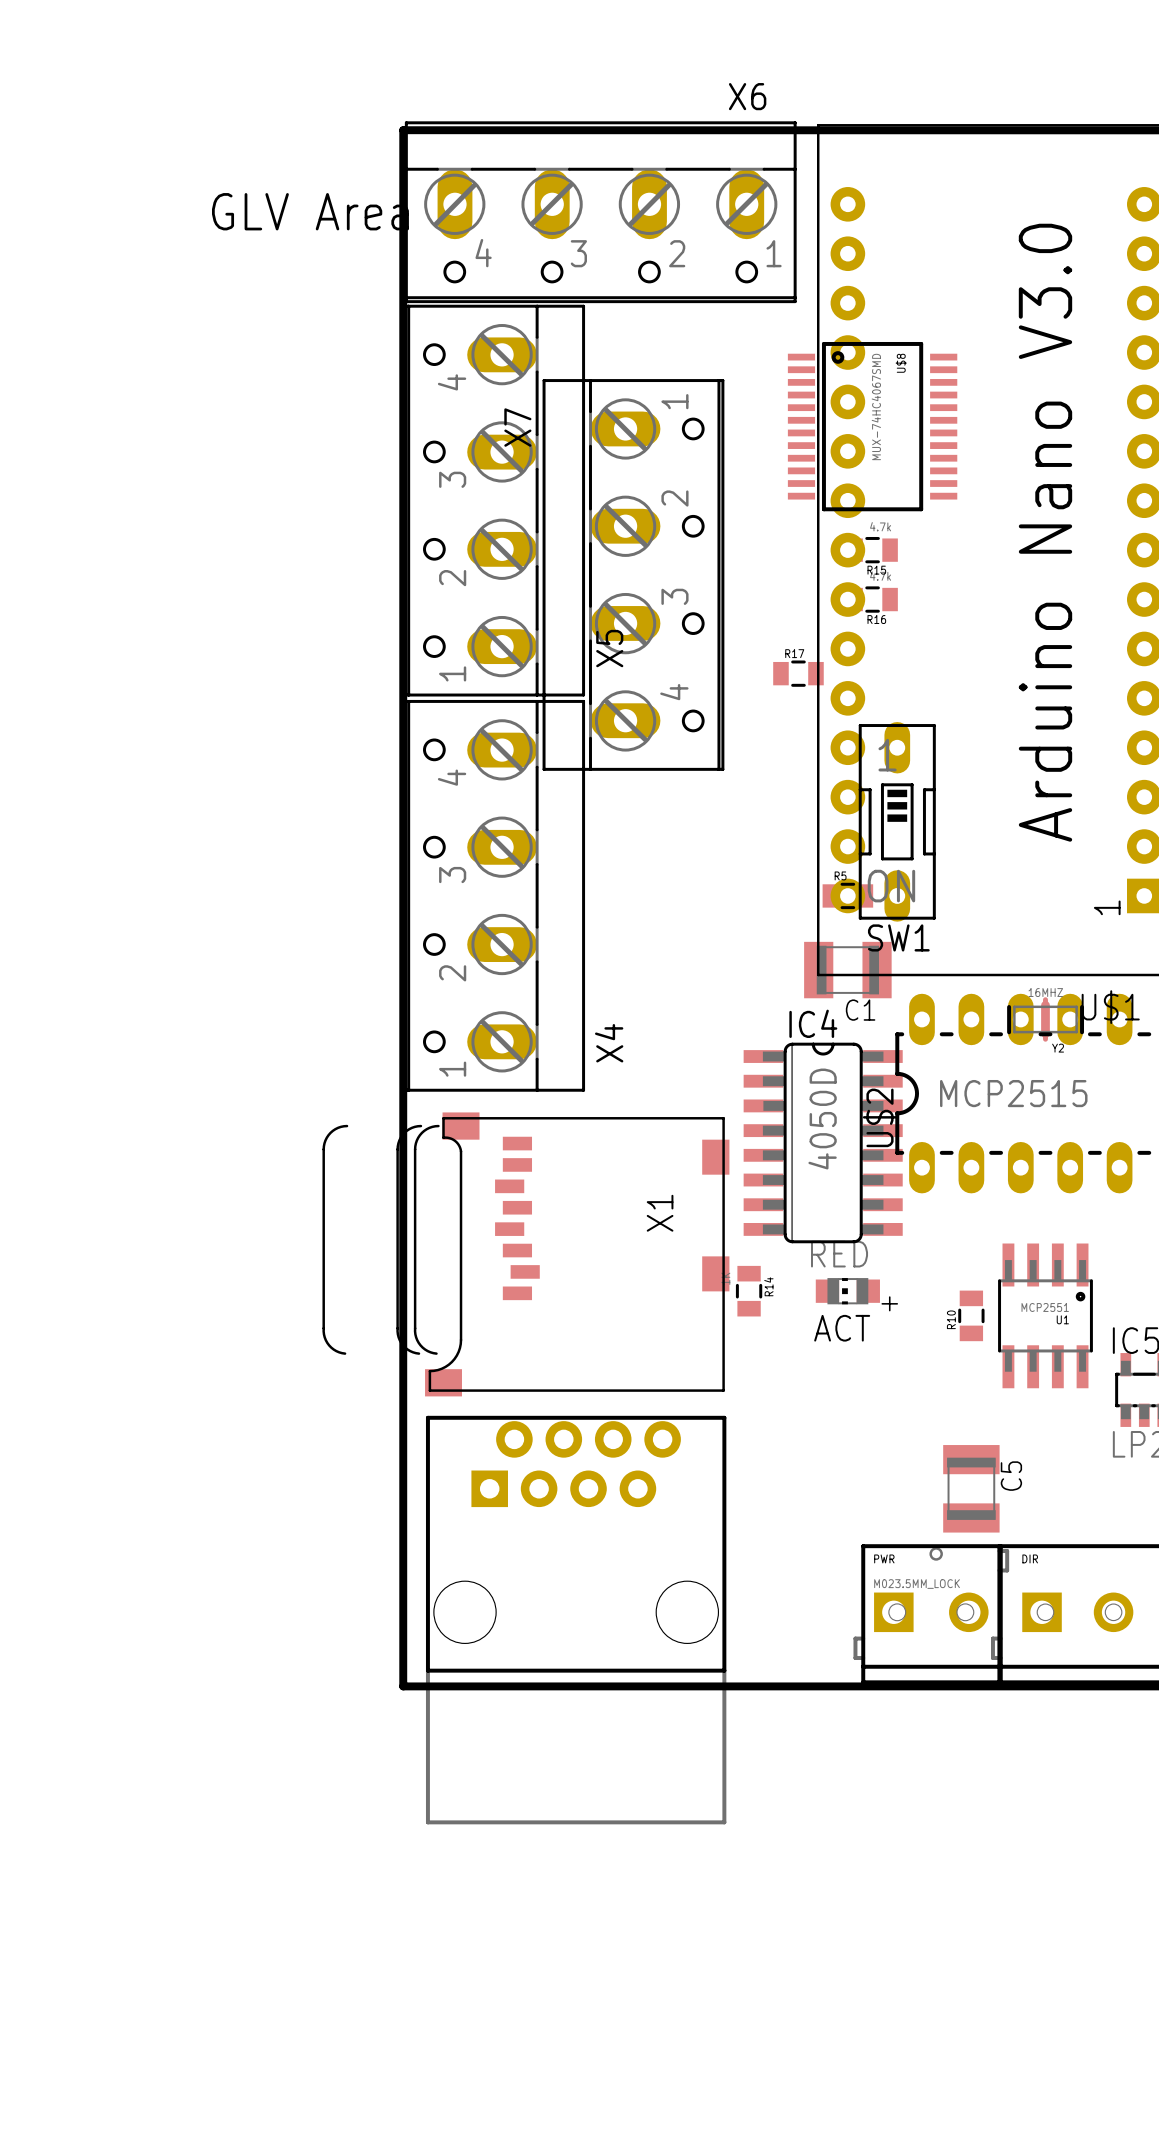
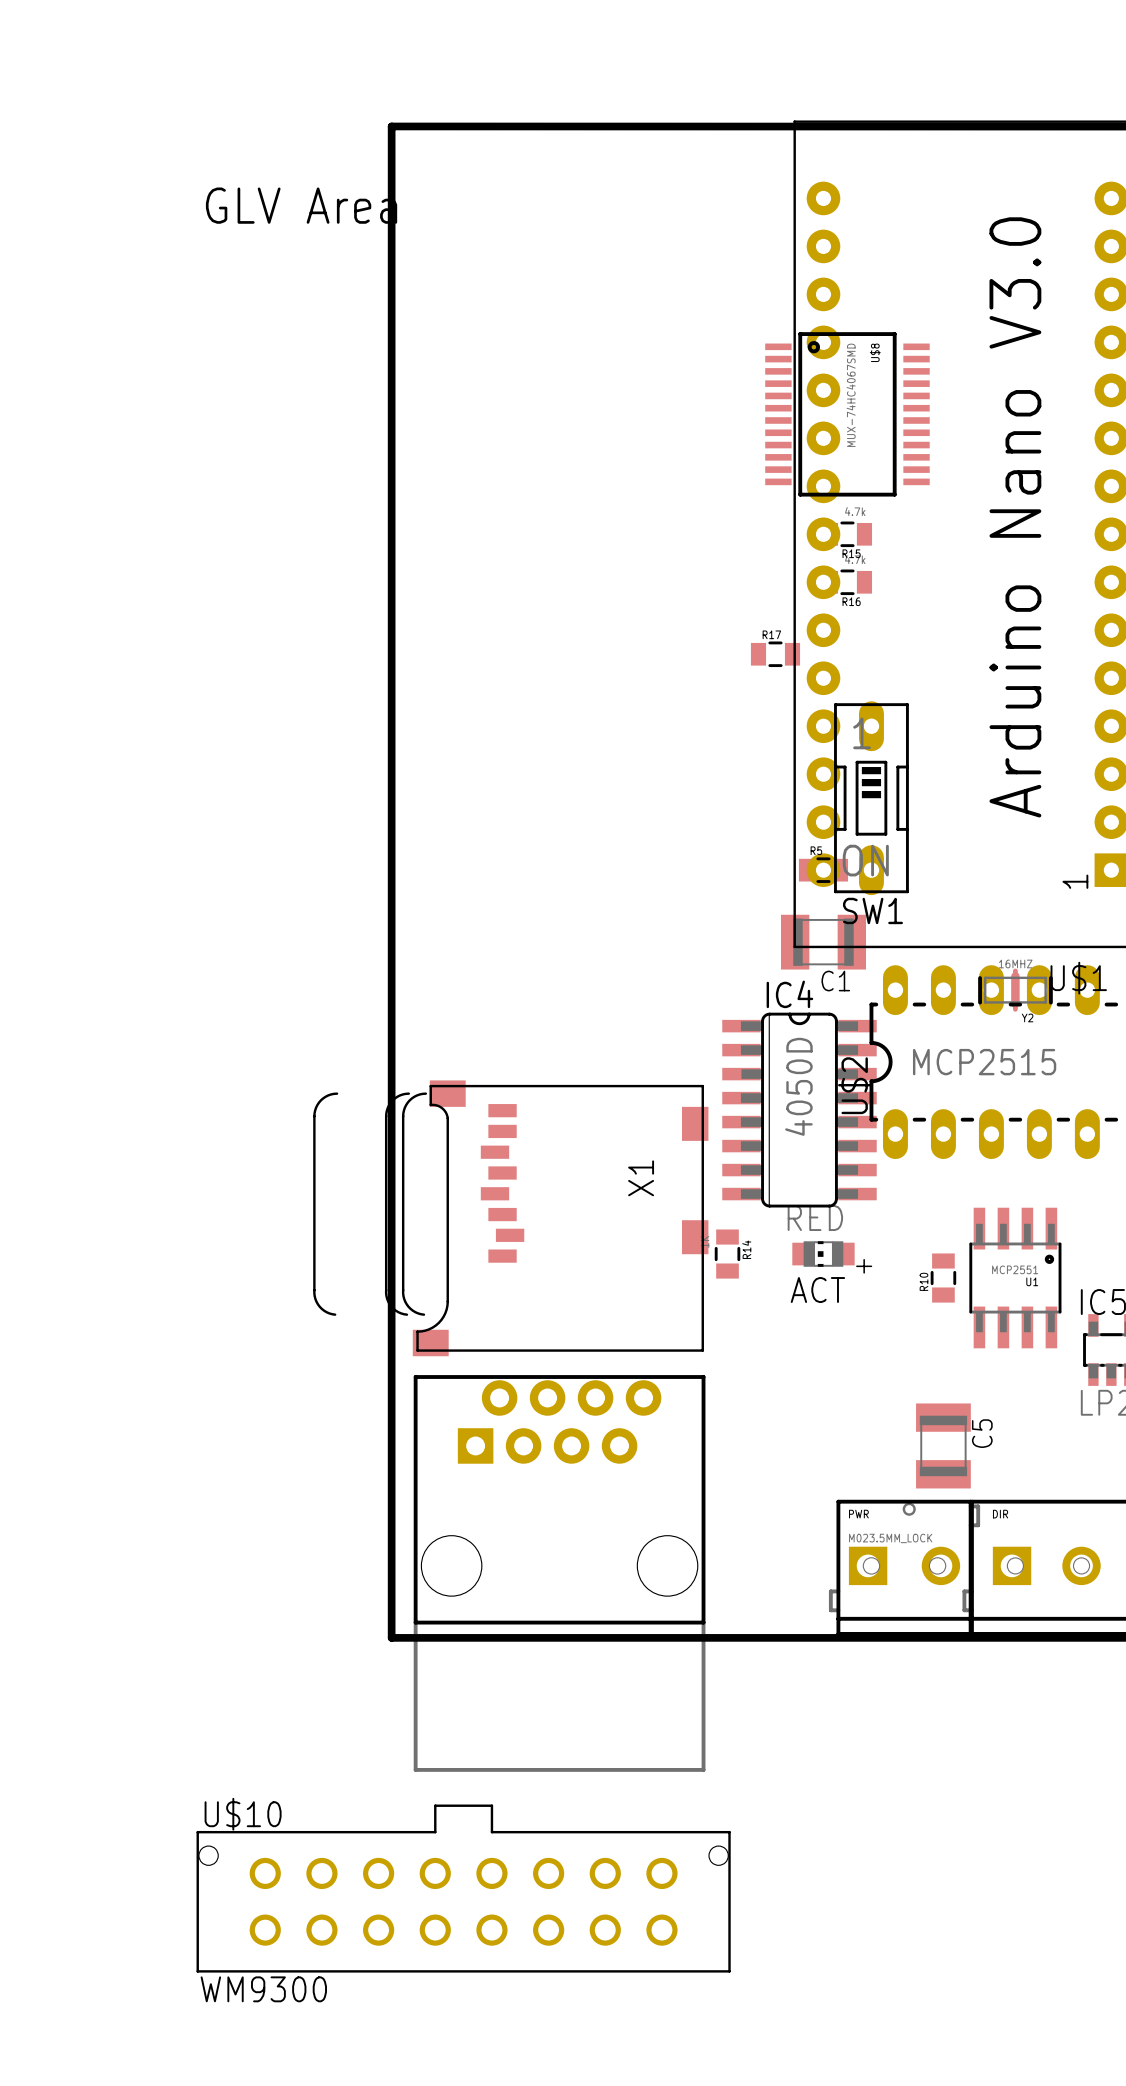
X6: (600, 212) -> none
X5: (494, 500) -> none
X7: (633, 574) -> none
X4: (494, 895) -> none
U$10: none -> WM9300 (463, 1888)

